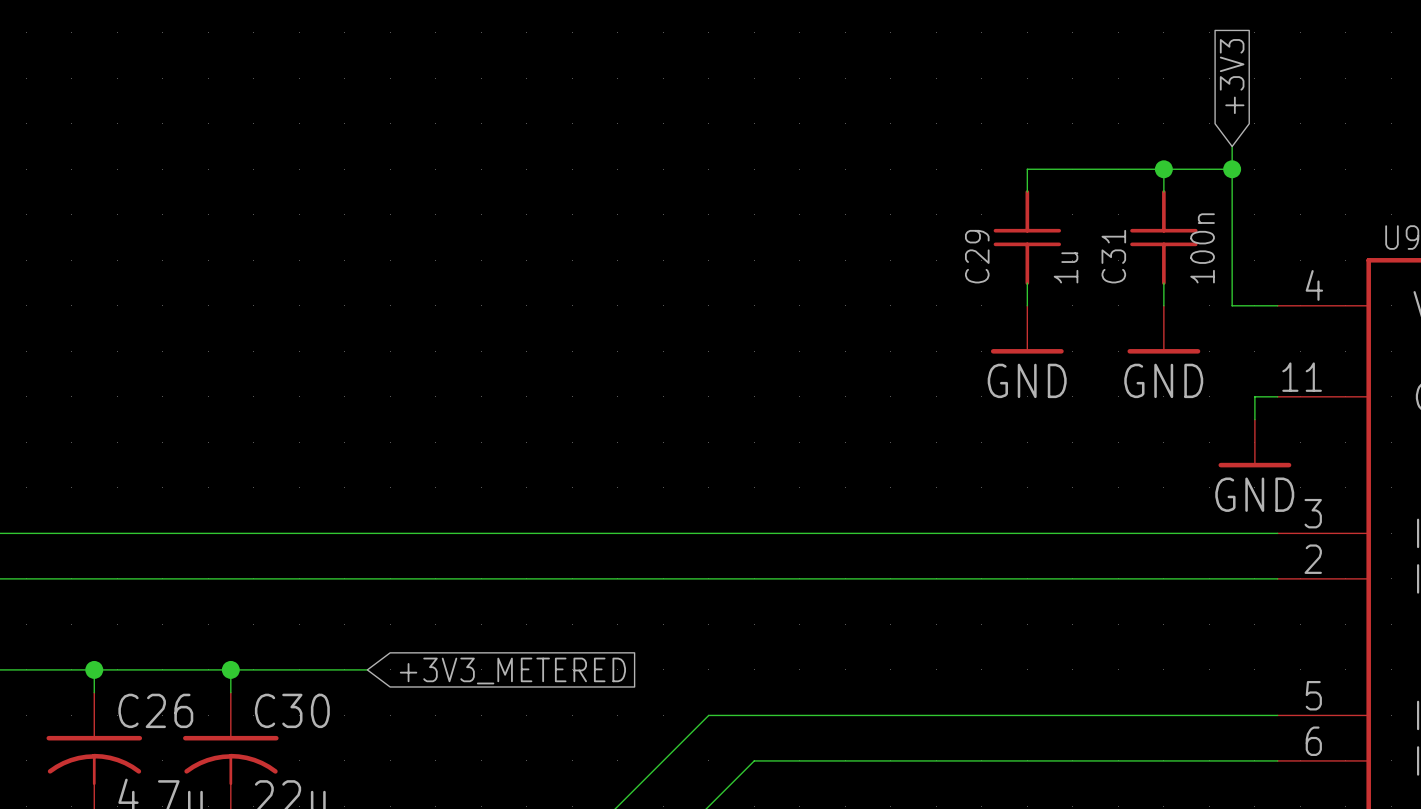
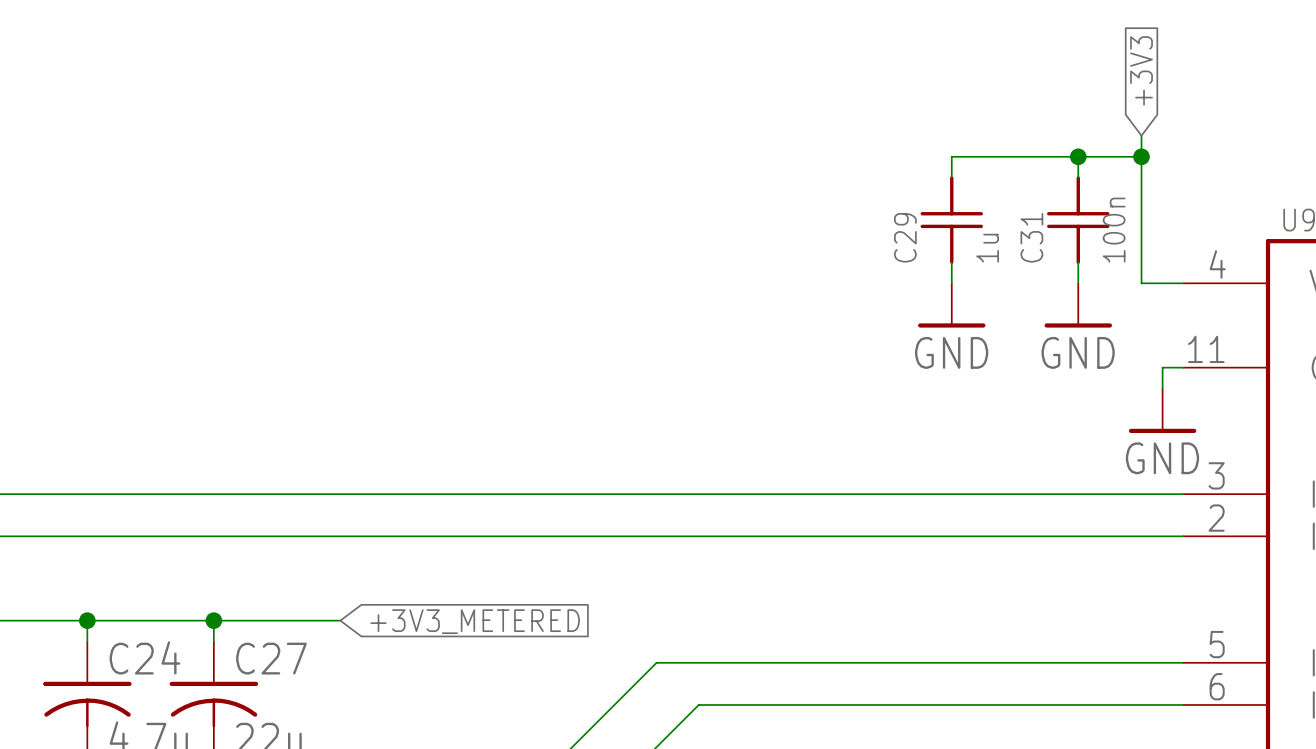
C26 name: C26 (155, 710) -> C24 (144, 657)
C30 name: C30 (292, 710) -> C27 (271, 658)

